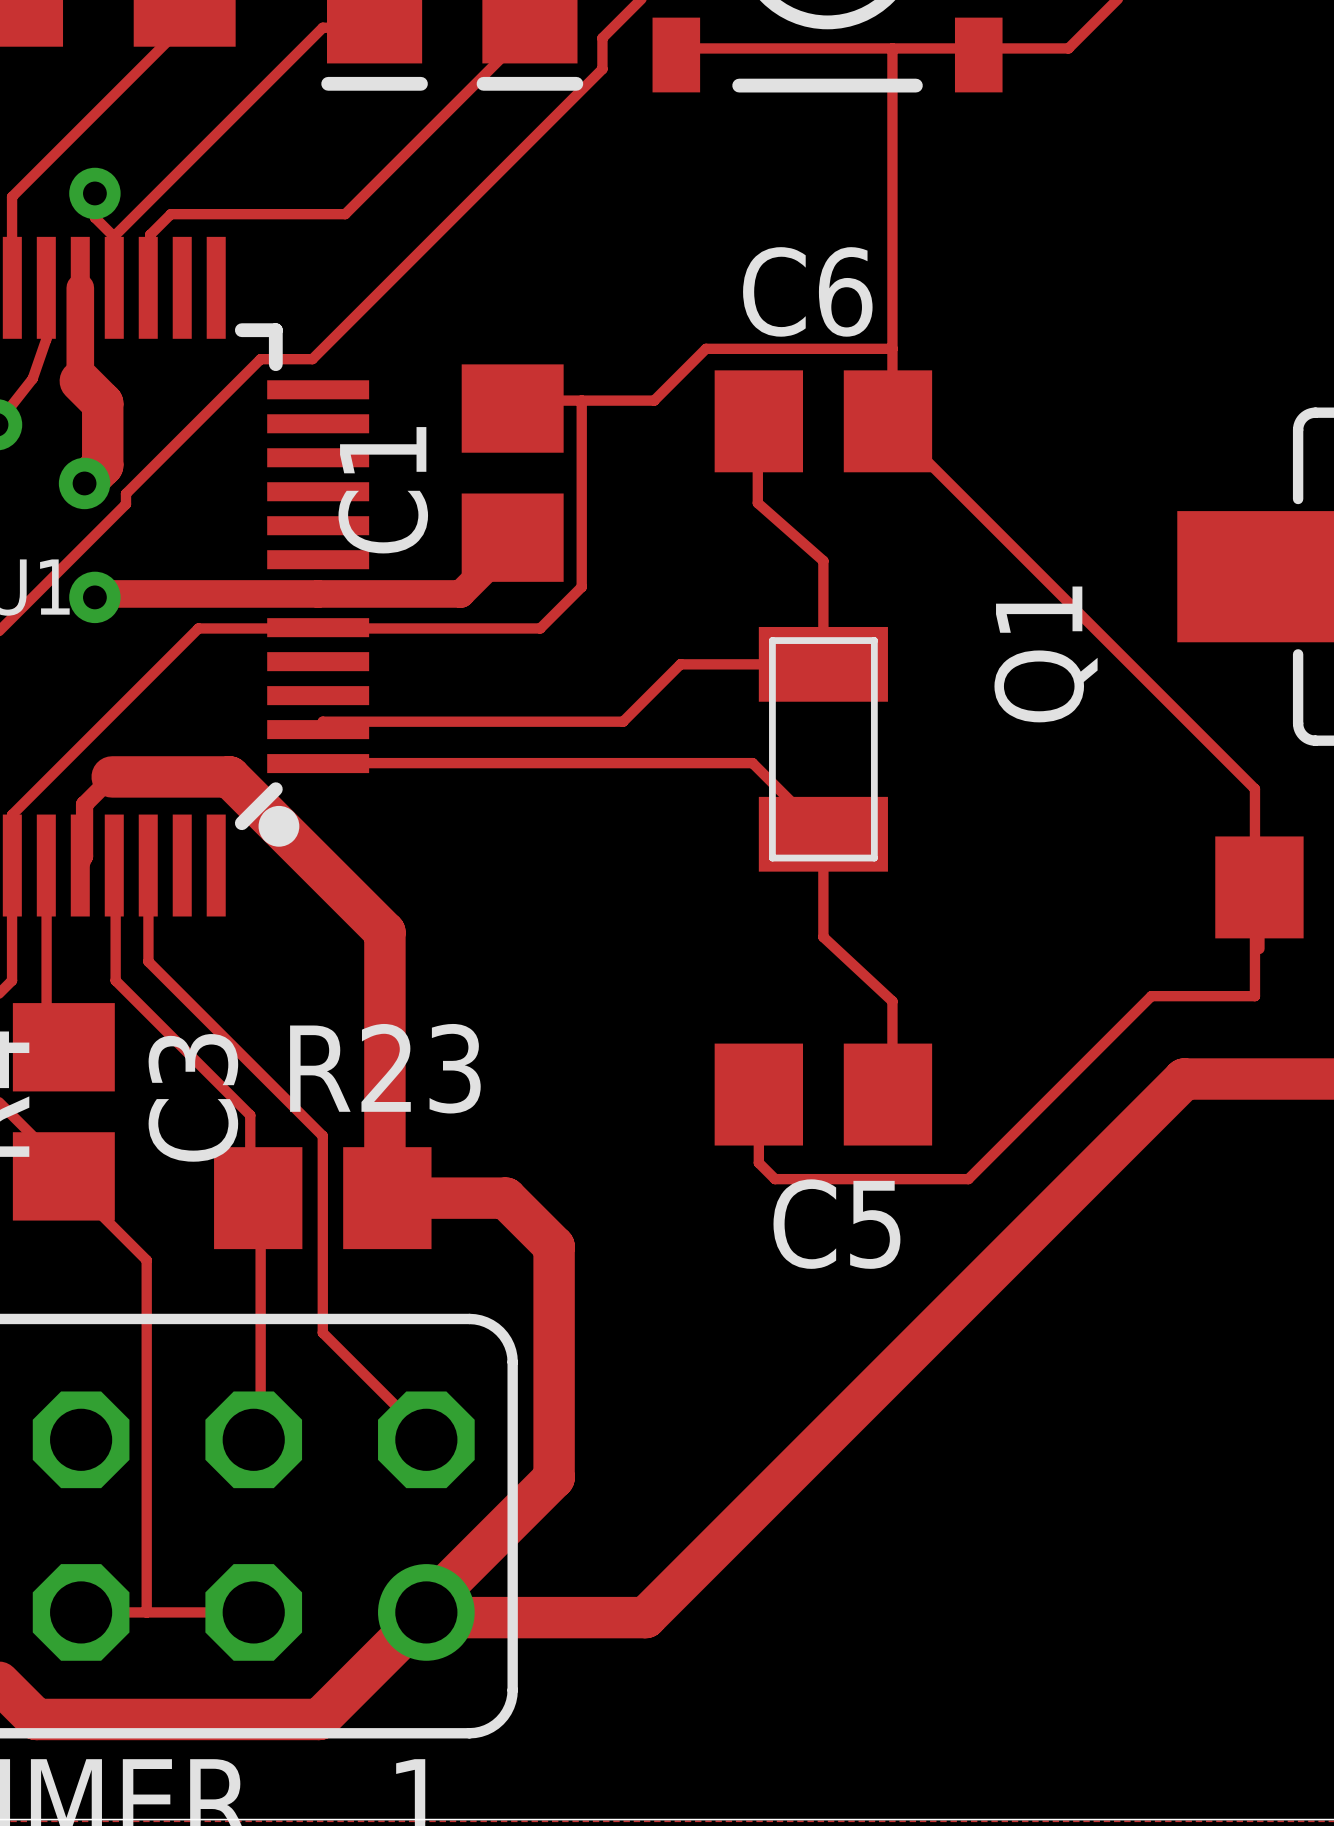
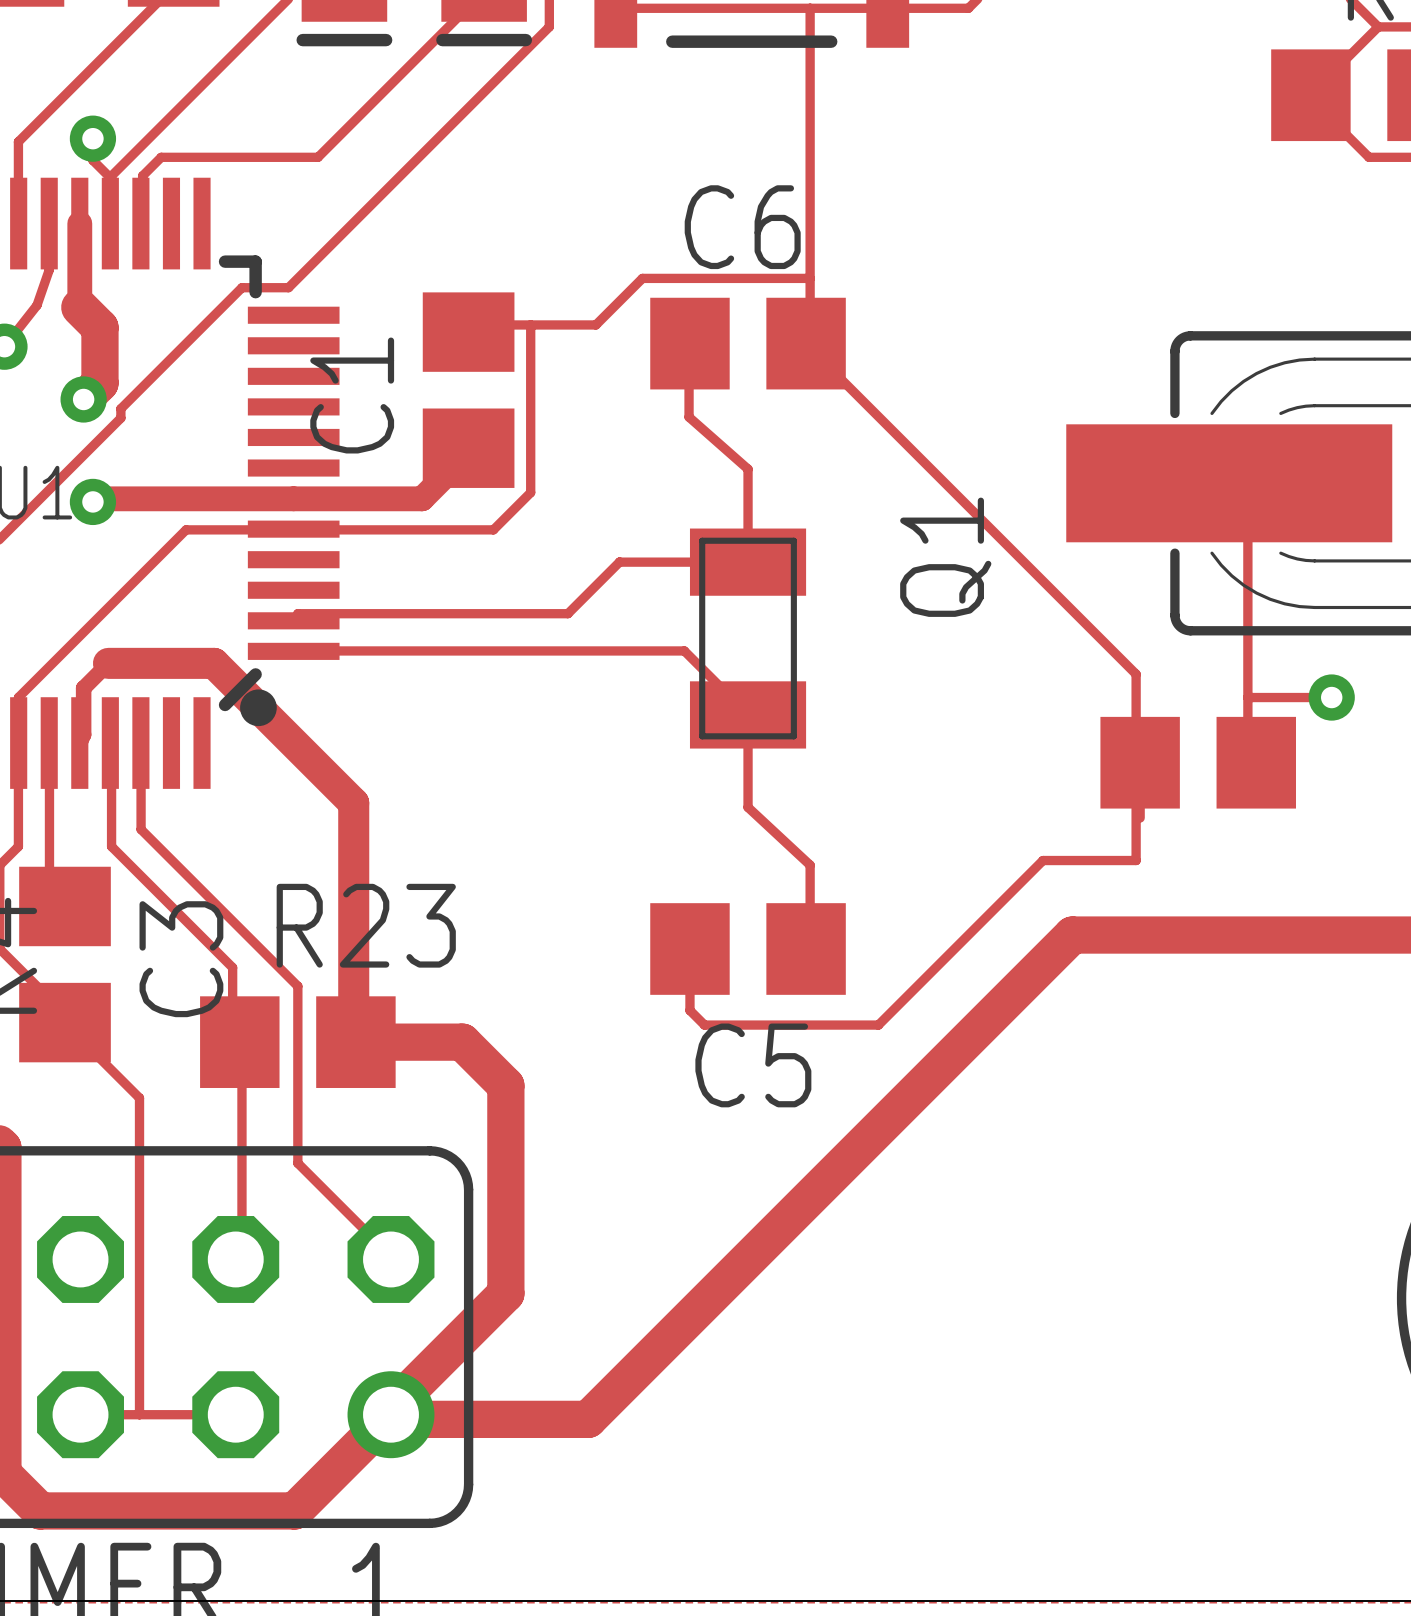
track width: thick (112, 776) (229, 776) (384, 932) (384, 1198) -> thin (108, 663) (214, 663) (353, 803) (353, 1042)

